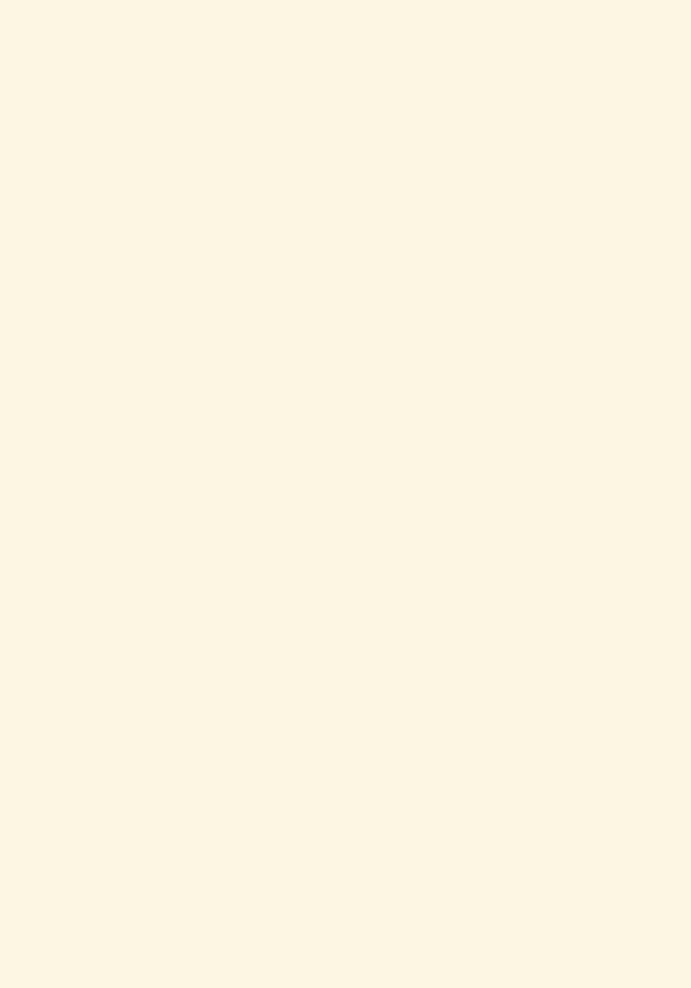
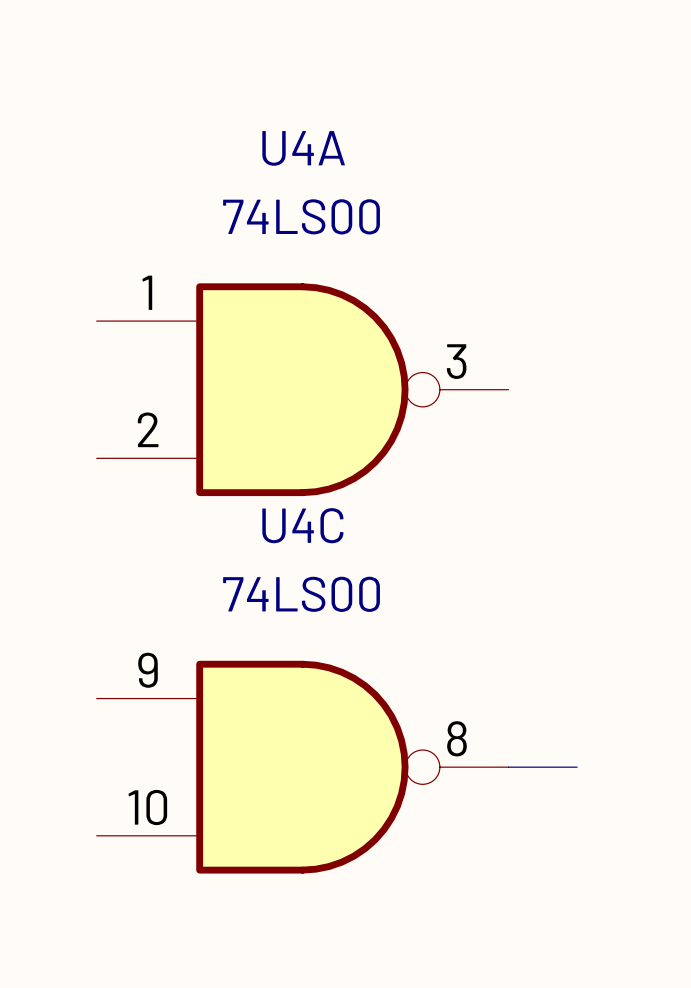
U4A: none -> 74LS00 (302, 389)
U4C: none -> 74LS00 (302, 767)
wire: none -> (508, 767) (577, 767)

